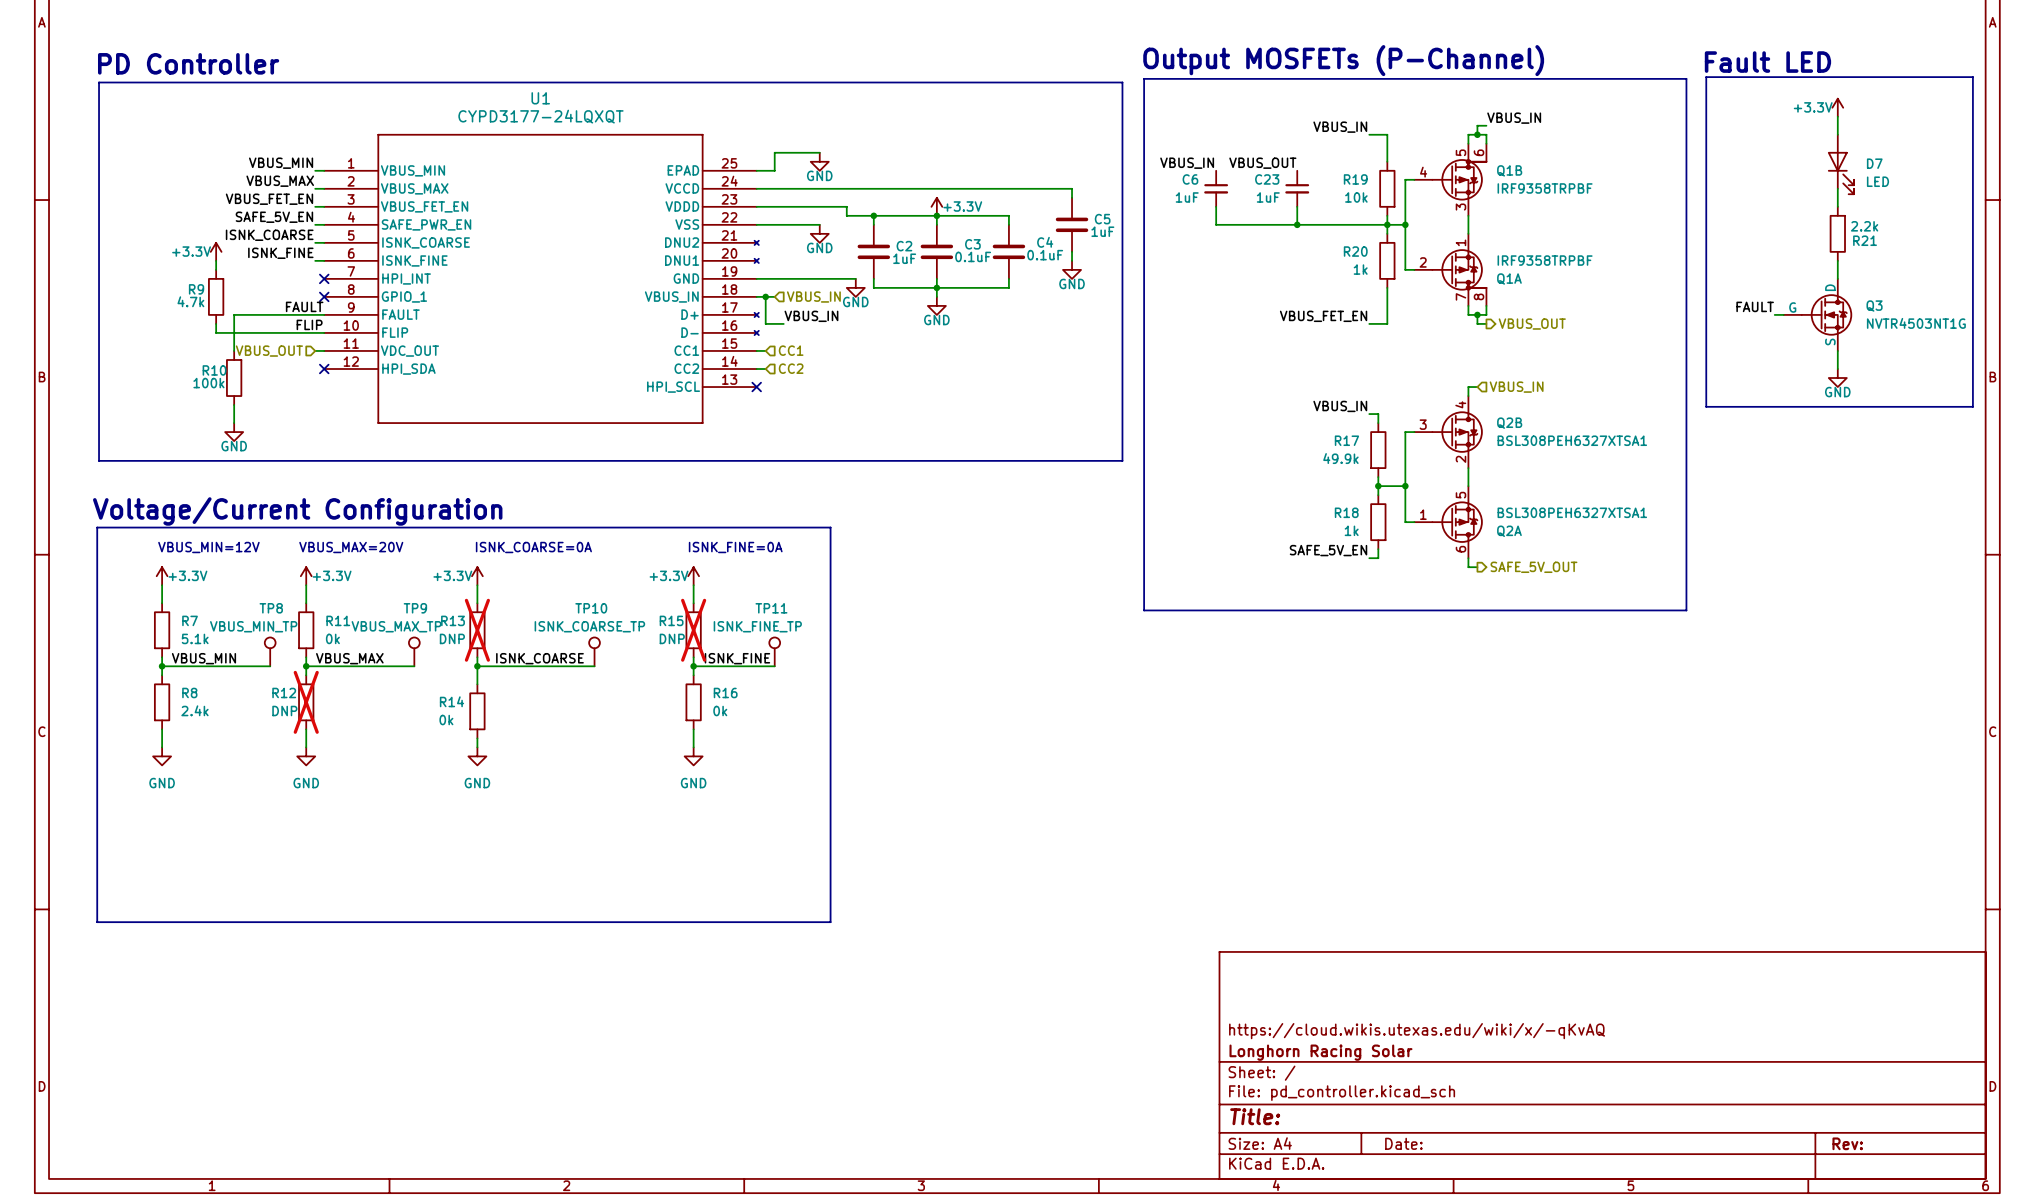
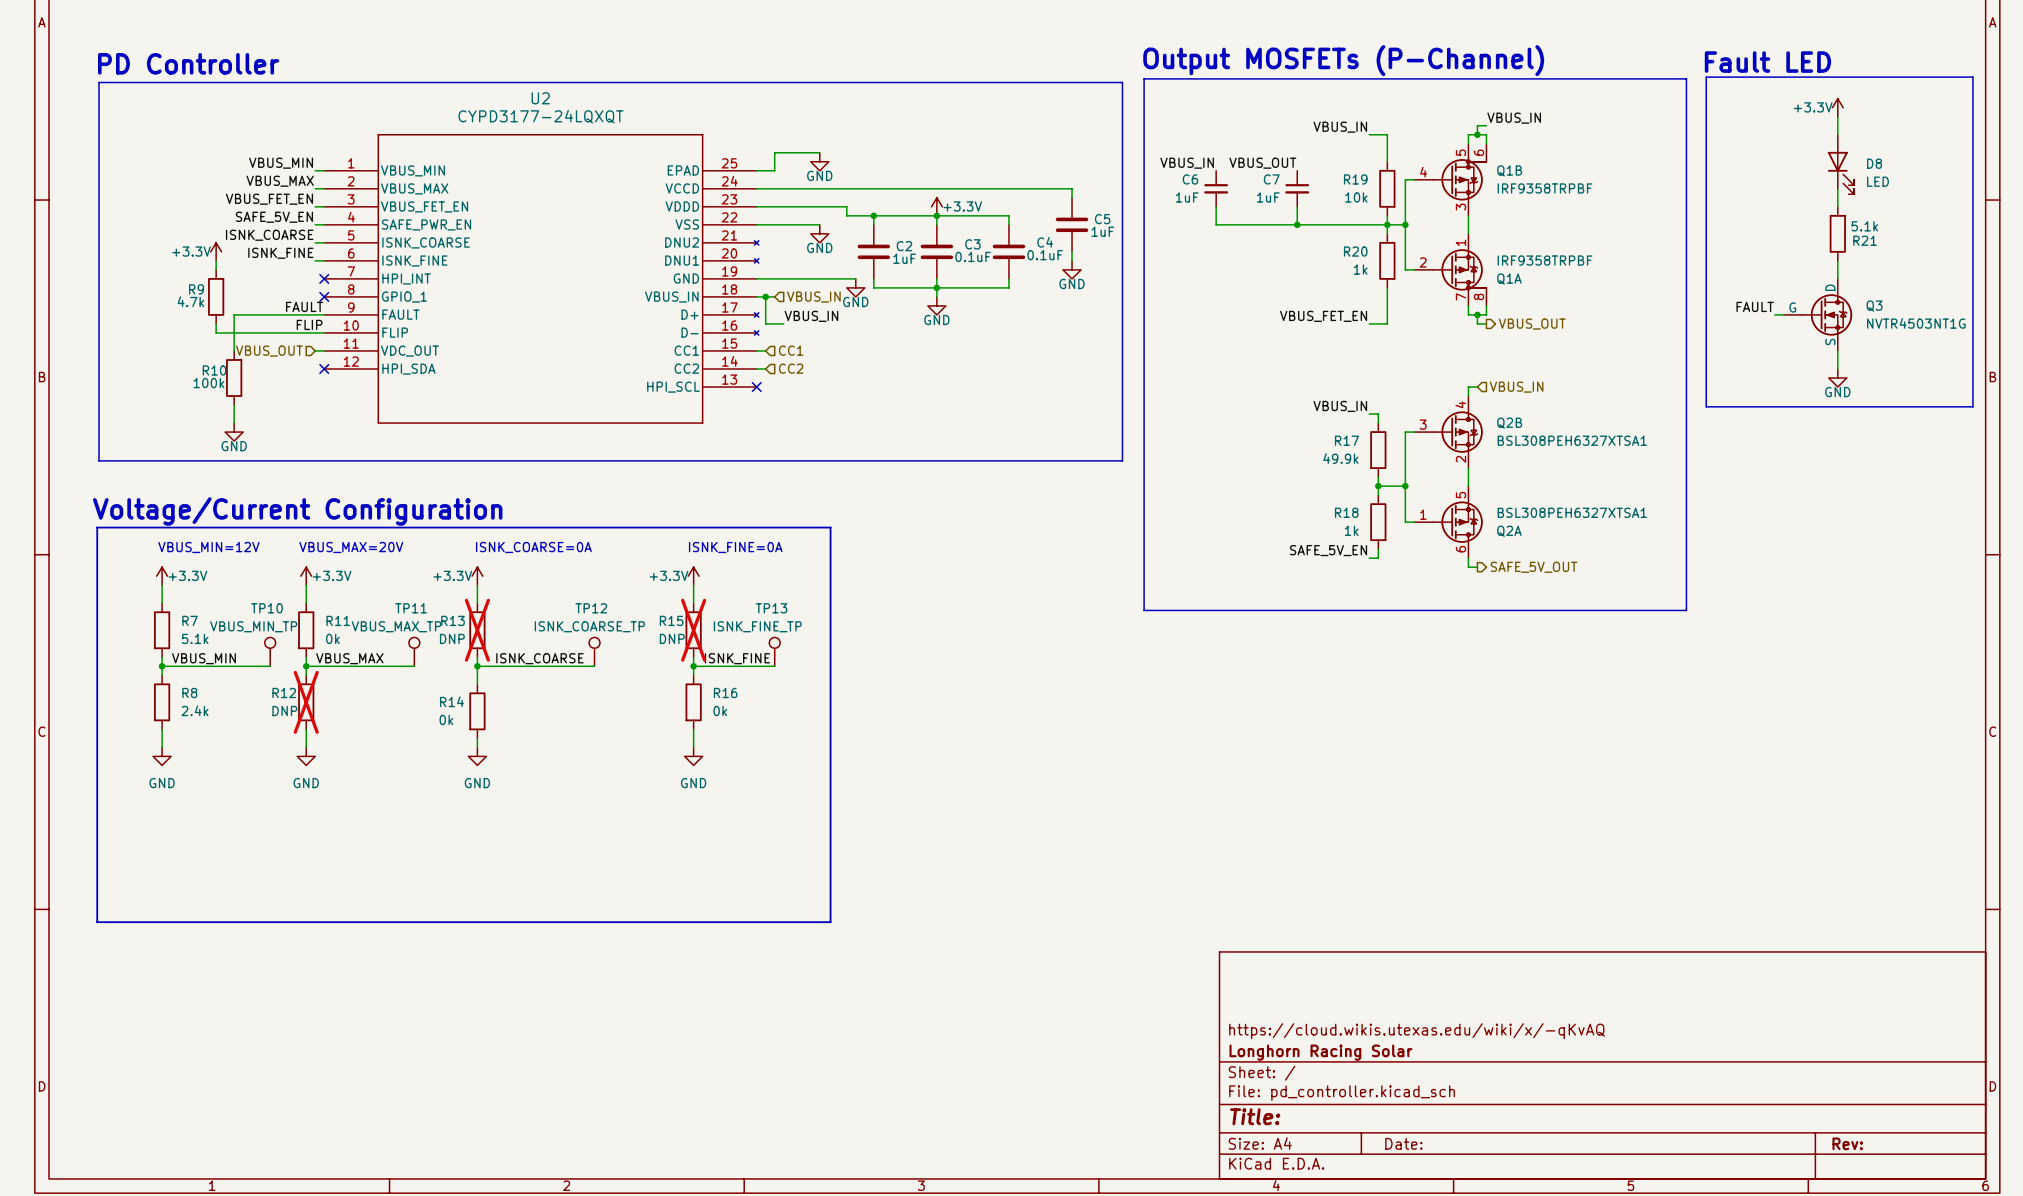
U1 name: U1 (540, 98) -> U2 (540, 98)
D7 name: D7 (1874, 163) -> D8 (1874, 163)
C23 name: C23 (1267, 179) -> C7 (1271, 179)
R21 value: 2.2k (1864, 226) -> 5.1k (1864, 226)
TP8 name: TP8 (271, 608) -> TP10 (266, 608)
TP9 name: TP9 (415, 608) -> TP11 (411, 608)
TP10 name: TP10 (591, 608) -> TP12 (591, 608)
TP11 name: TP11 (771, 608) -> TP13 (771, 608)

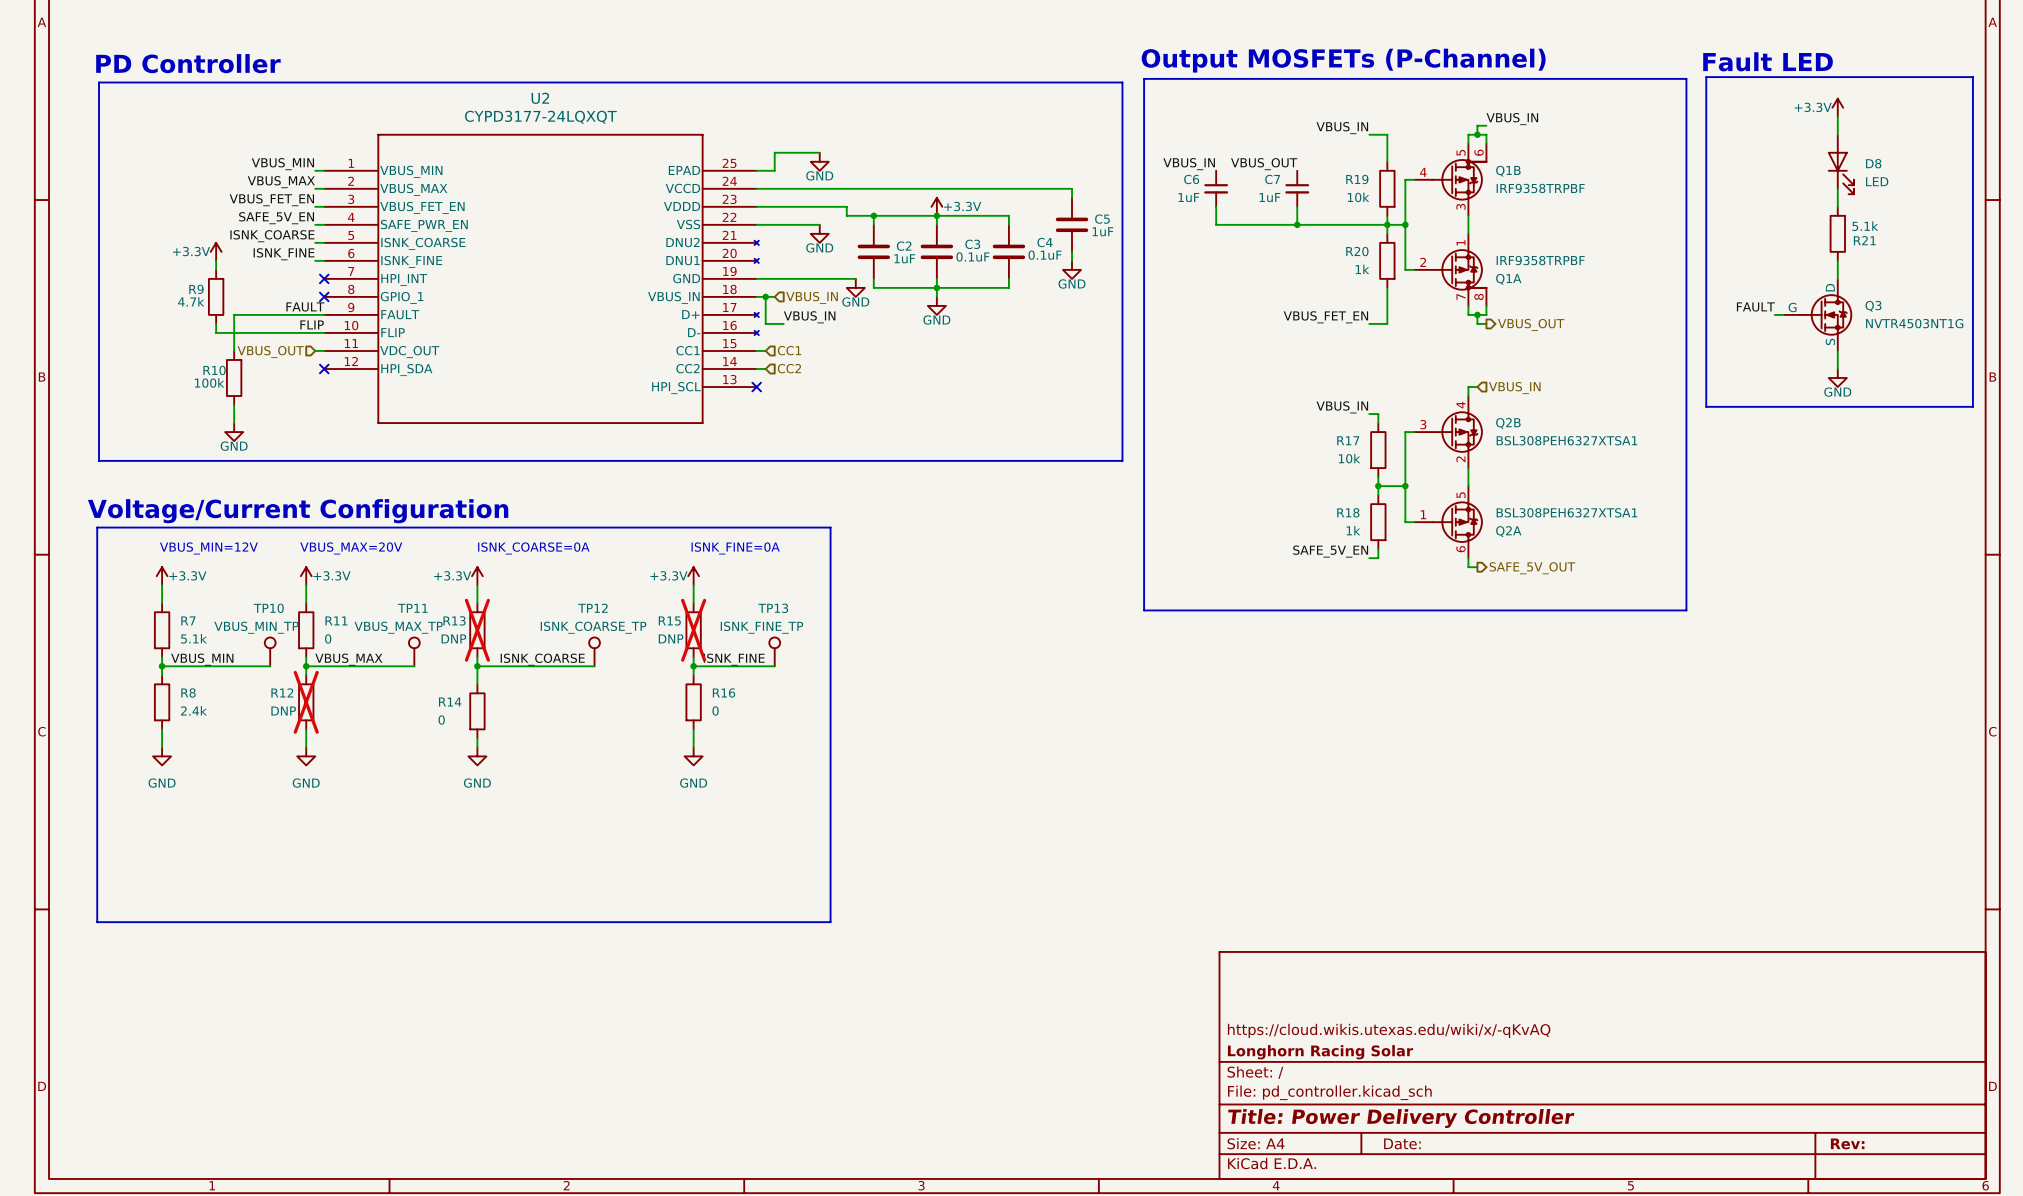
R17 value: 49.9k (1340, 458) -> 10k (1349, 458)
R11 value: 0k (332, 638) -> 0 (328, 638)
R16 value: 0k (720, 711) -> 0 (715, 711)
R14 value: 0k (446, 720) -> 0 (441, 720)
title block: Title: (1255, 1116) -> Title: Power Delivery Controller (1401, 1118)

